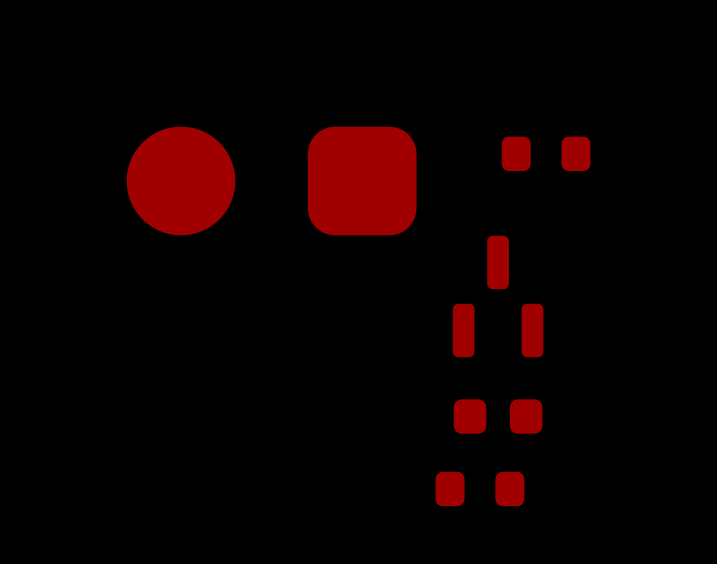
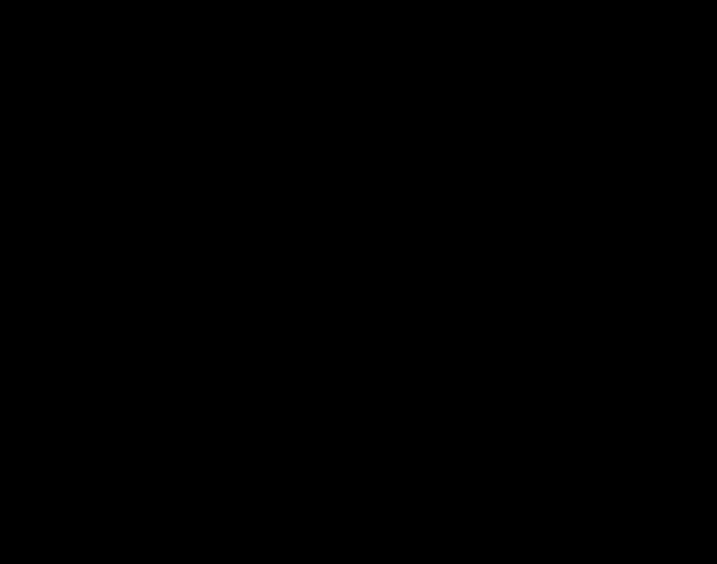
part: (546, 153) -> none
part: (271, 181) -> none
part: (498, 296) -> none
part: (498, 416) -> none
part: (479, 489) -> none

